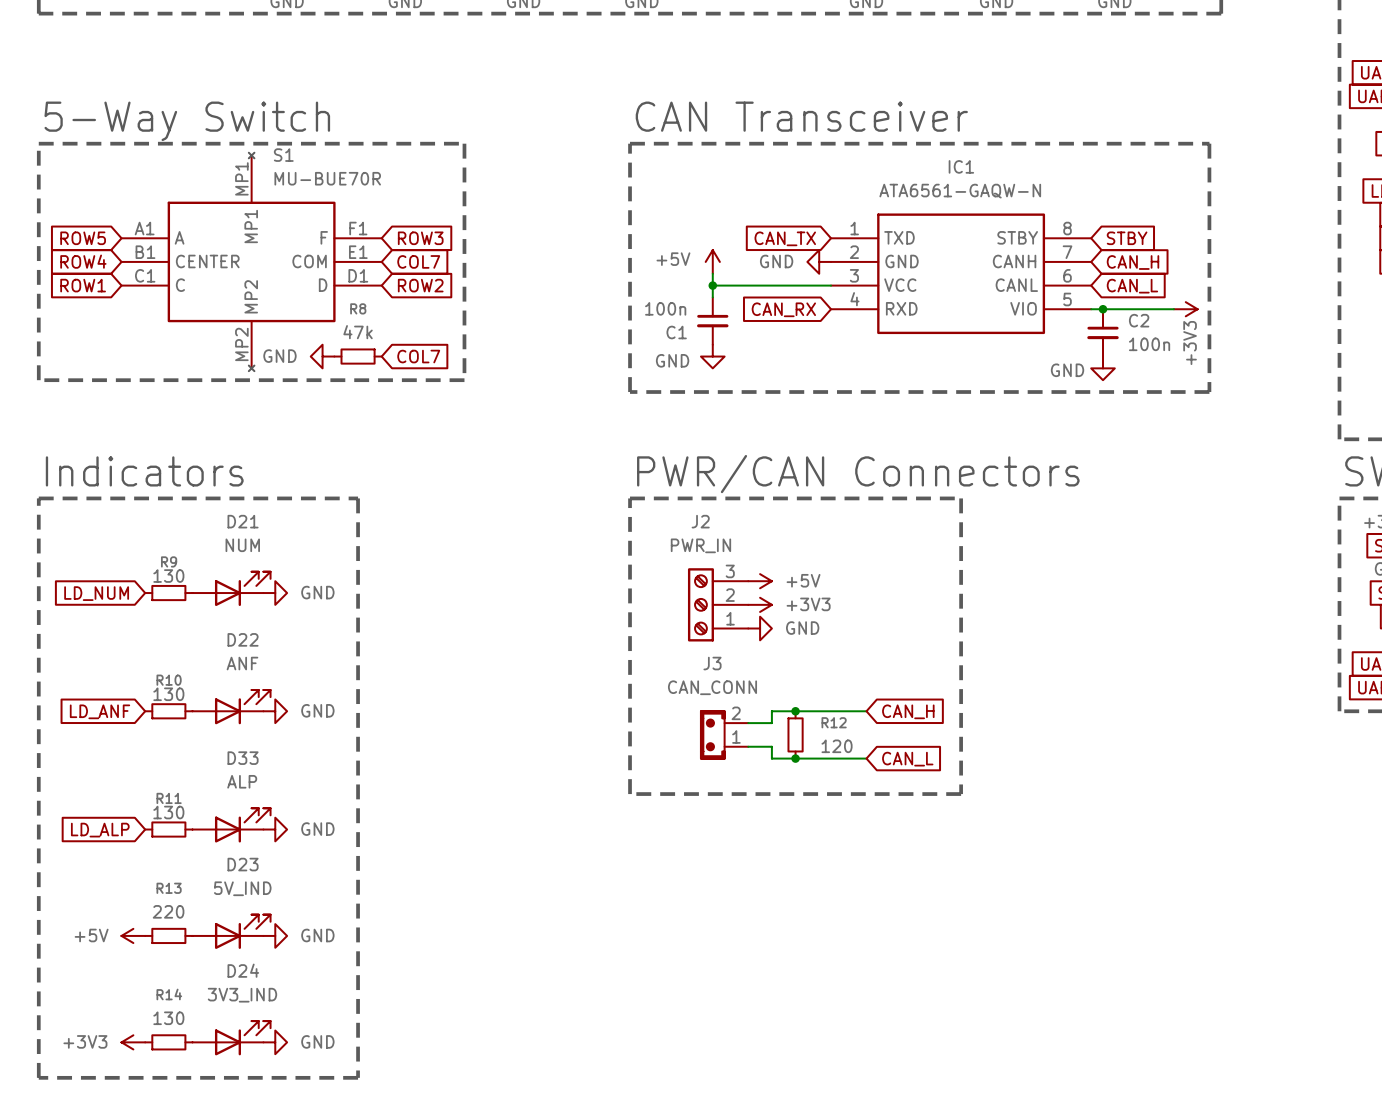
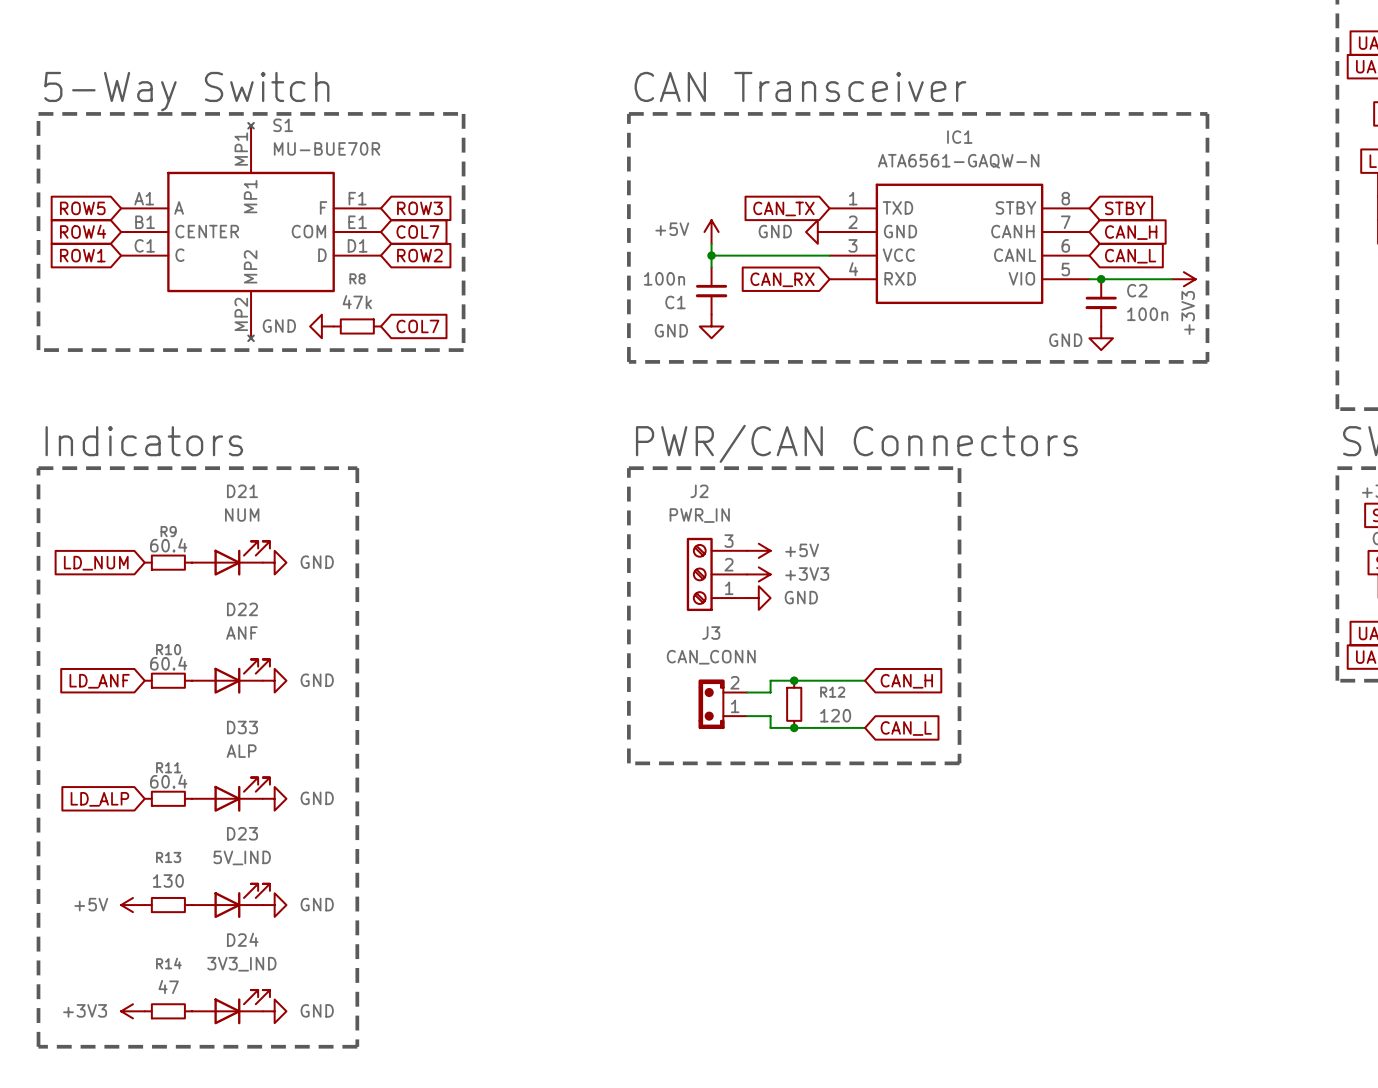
R9 value: 130 (168, 576) -> 60.4 (168, 545)
R10 value: 130 (168, 694) -> 60.4 (168, 663)
R11 value: 130 (168, 812) -> 60.4 (168, 781)
R13 value: 220 (168, 911) -> 130 (168, 881)
R14 value: 130 (168, 1018) -> 47 (168, 986)

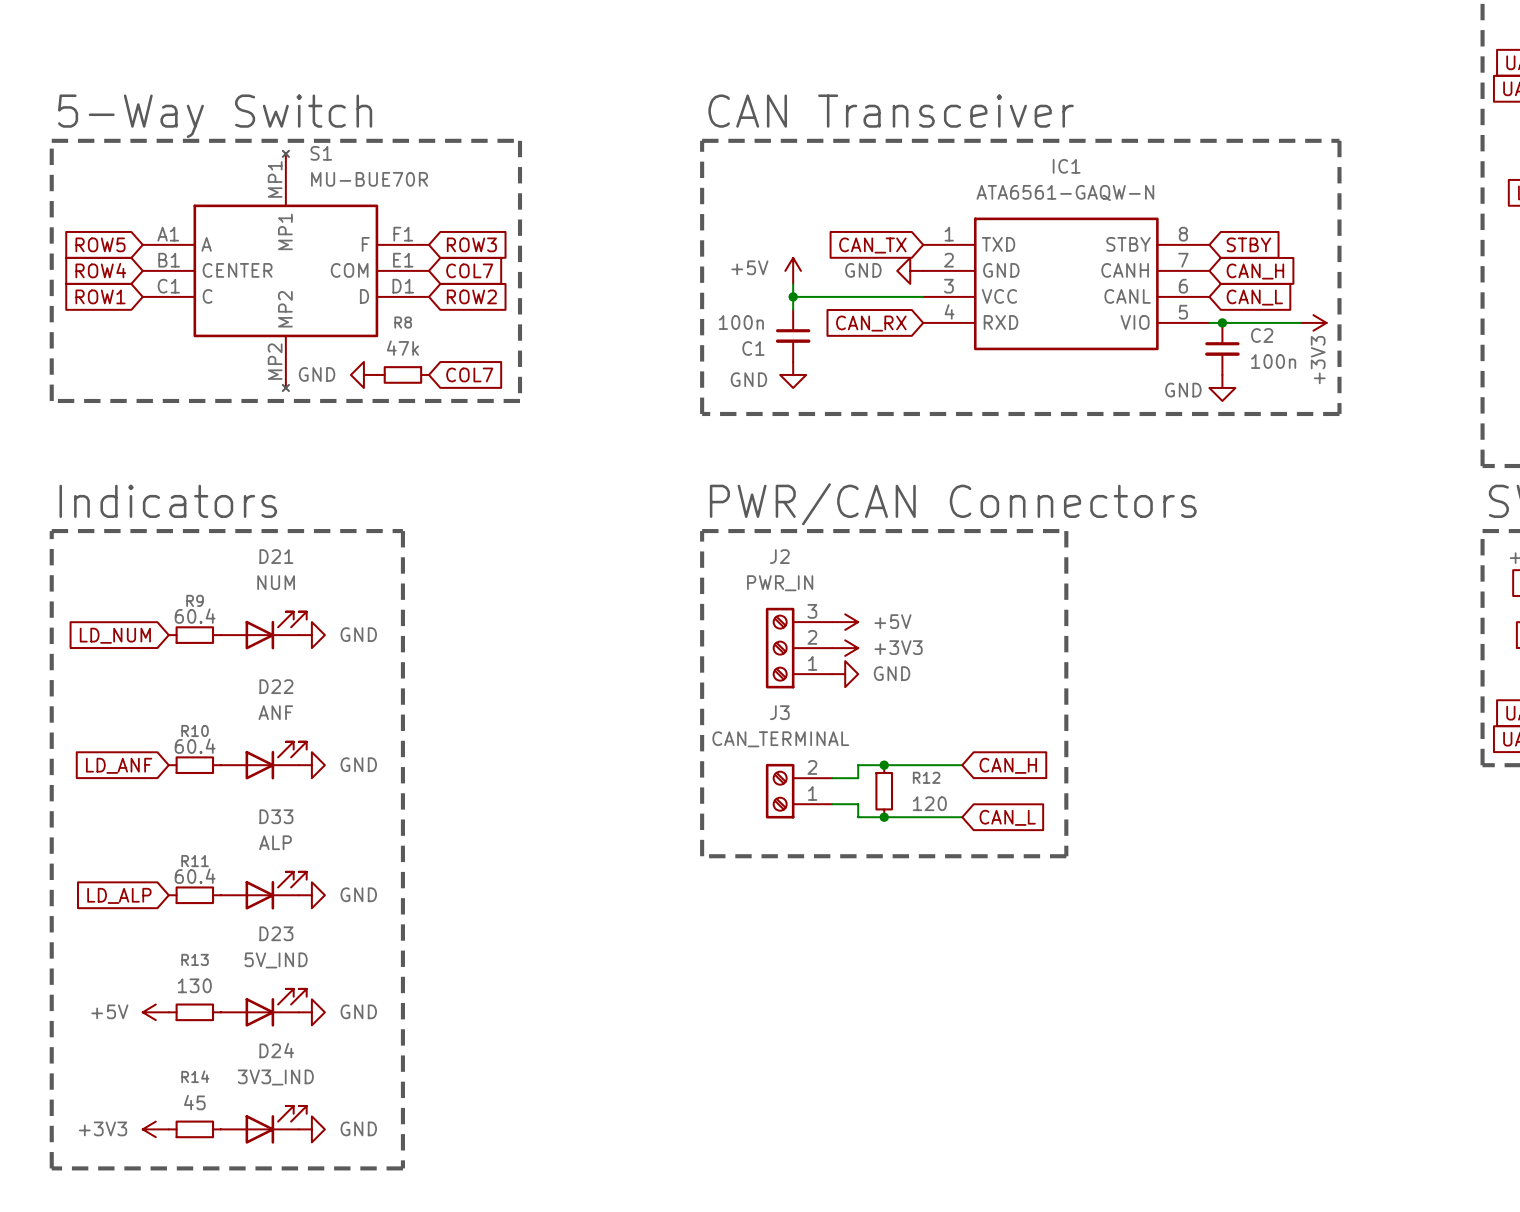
J3 value: CAN_CONN (711, 657) -> CAN_TERMINAL (780, 739)
J3 symbol: [699, 680, 747, 728] -> [765, 763, 833, 819]
R14 value: 47 (168, 986) -> 45 (194, 1102)

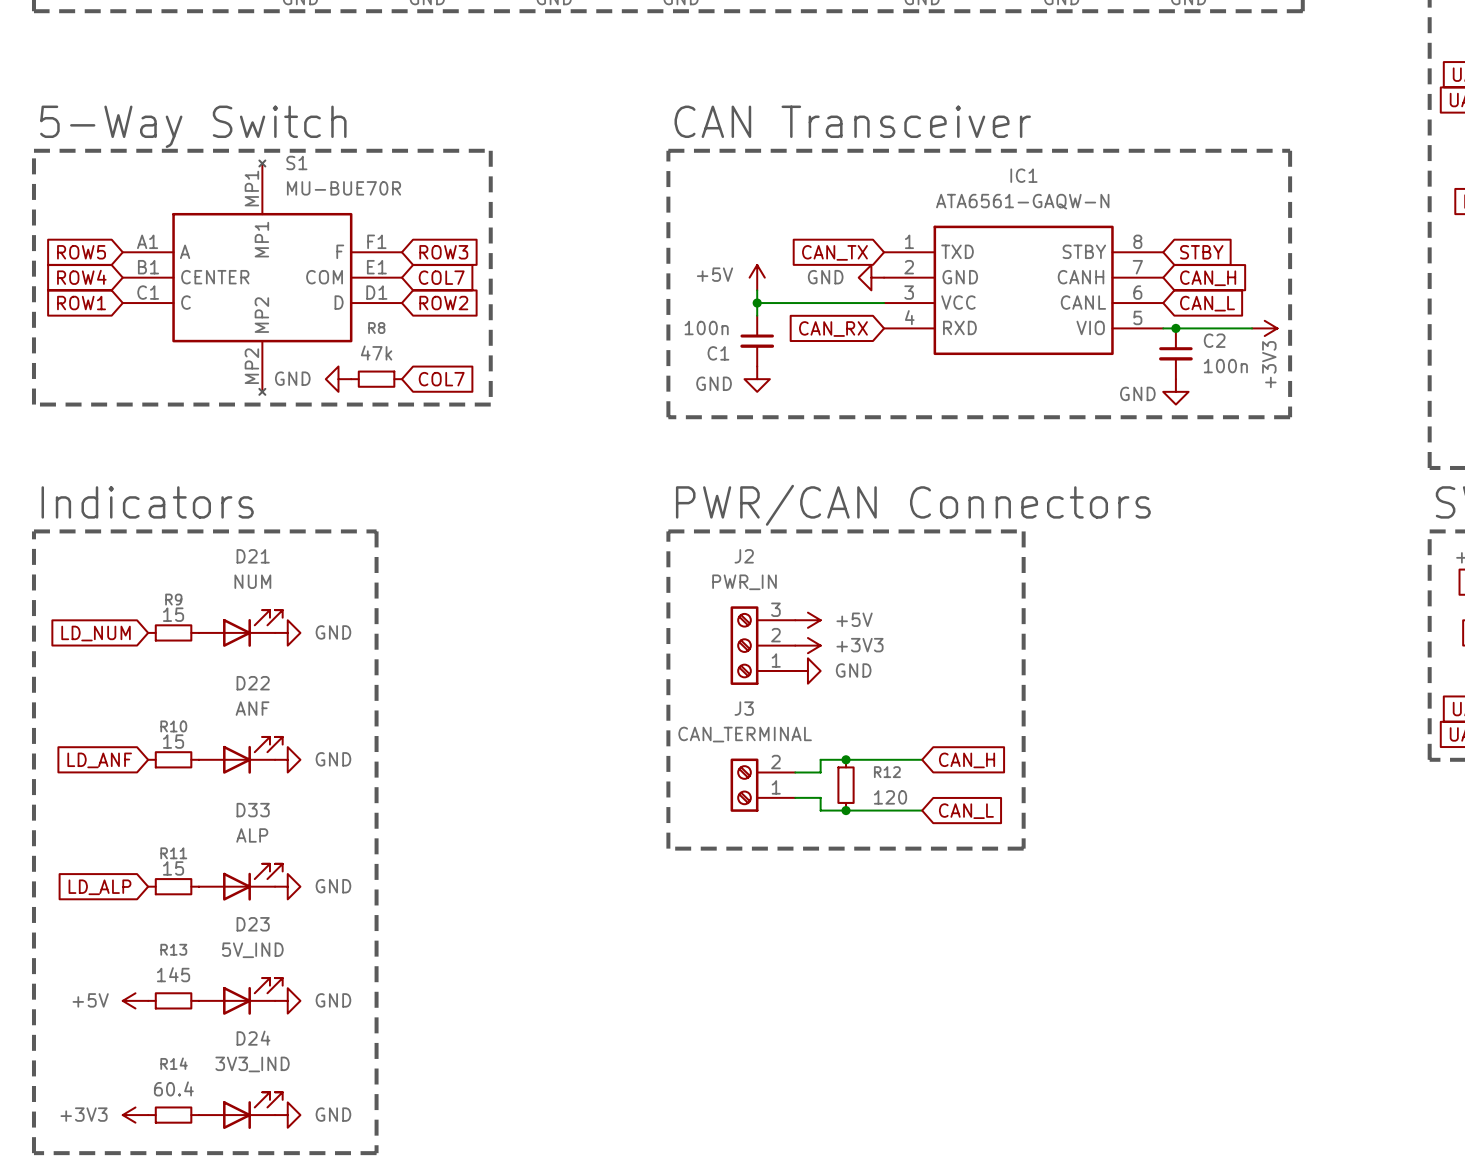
R9 value: 60.4 (195, 616) -> 15 (173, 614)
R10 value: 60.4 (195, 746) -> 15 (173, 741)
R11 value: 60.4 (195, 876) -> 15 (173, 868)
R13 value: 130 (194, 985) -> 145 (173, 974)
R14 value: 45 (194, 1102) -> 60.4 (173, 1088)

